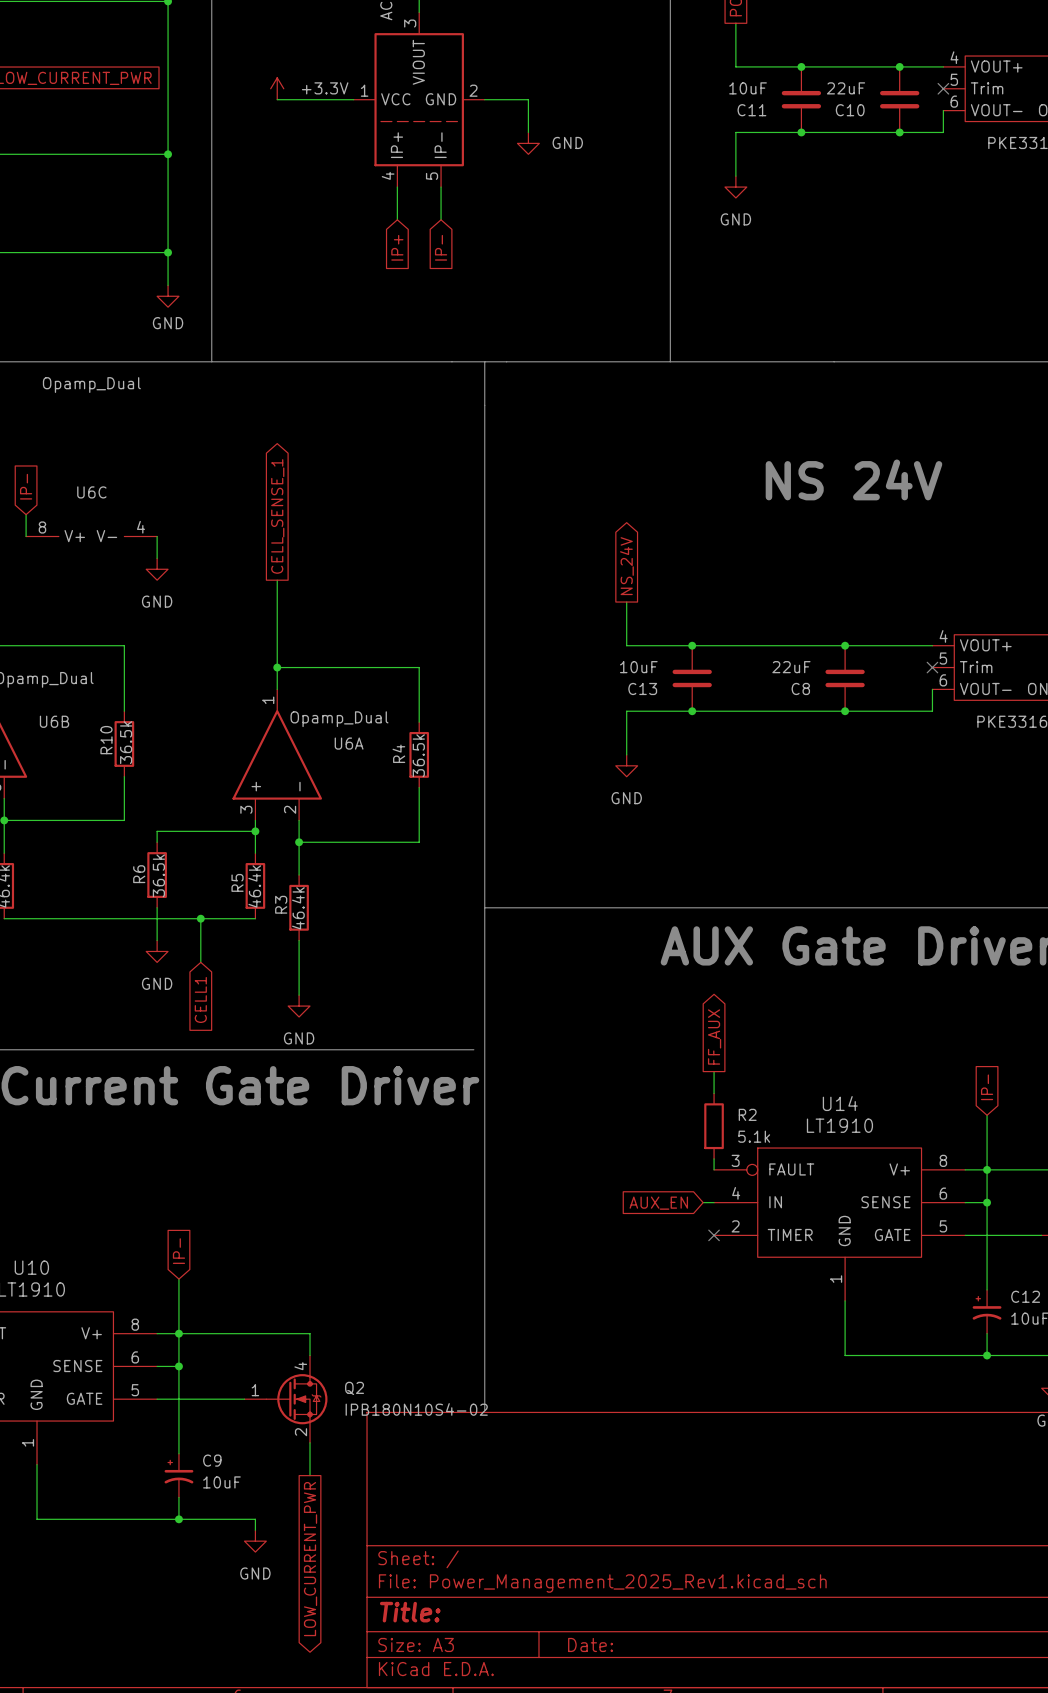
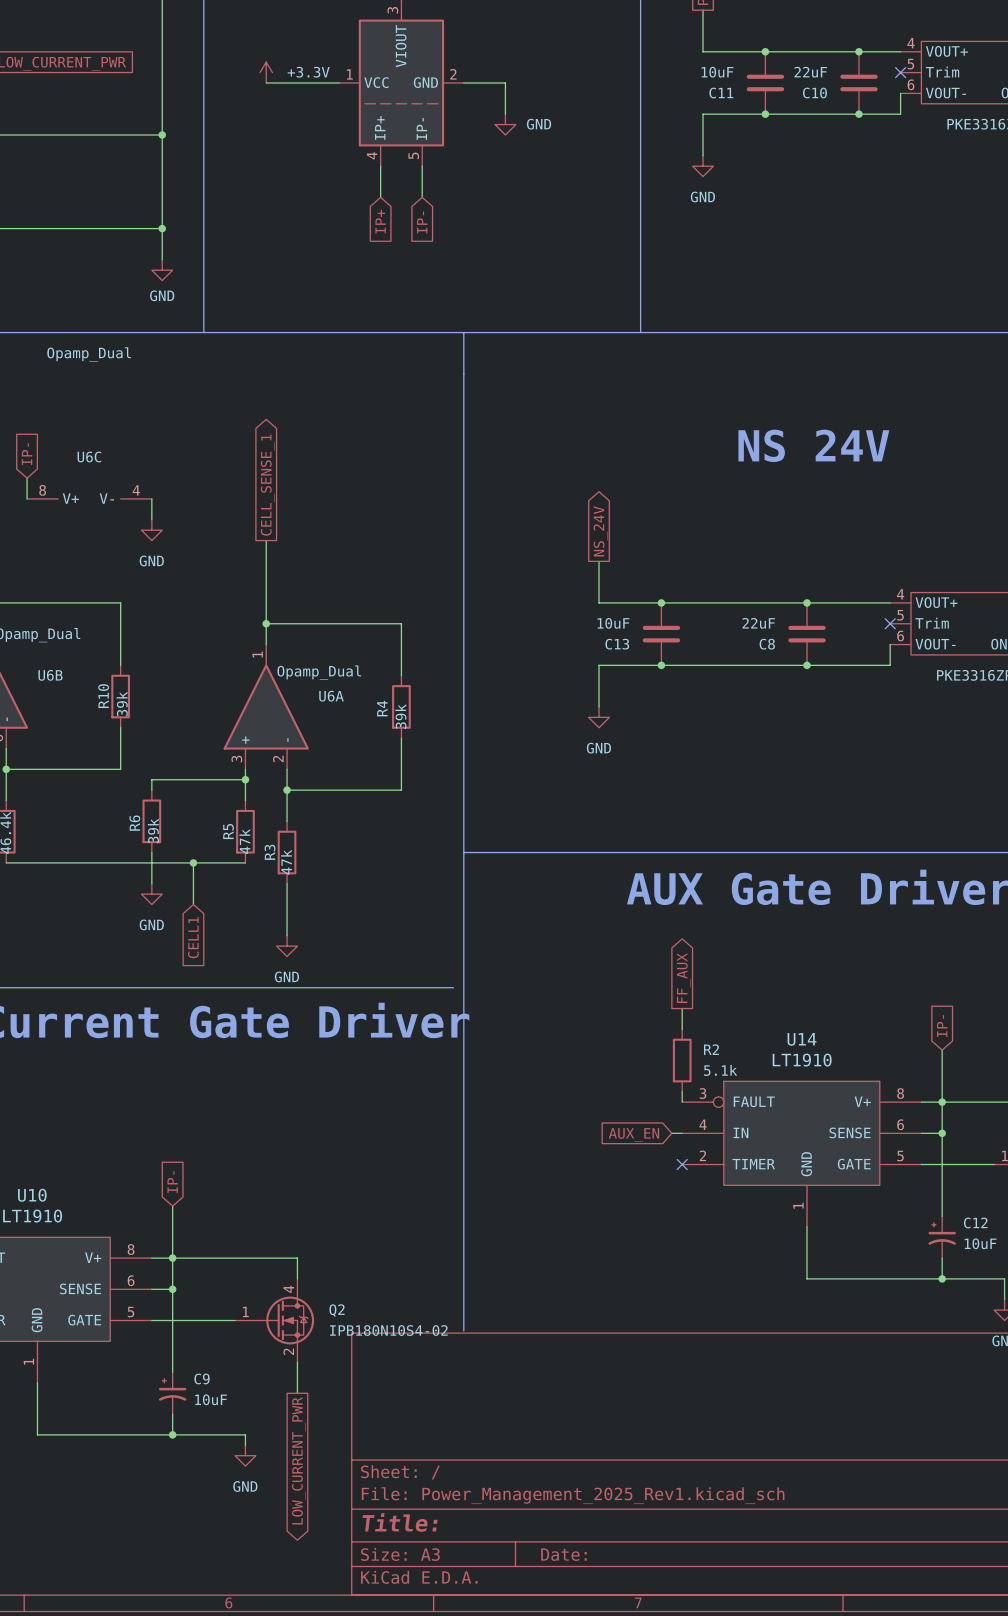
R10 value: 36.5k (126, 742) -> 39k (122, 704)
R4 value: 36.5k (418, 755) -> 39k (400, 716)
R6 value: 36.5k (158, 875) -> 39k (153, 830)
R5 value: 46.4k (254, 886) -> 47k (244, 841)
R3 value: 46.4k (298, 908) -> 47k (286, 862)

